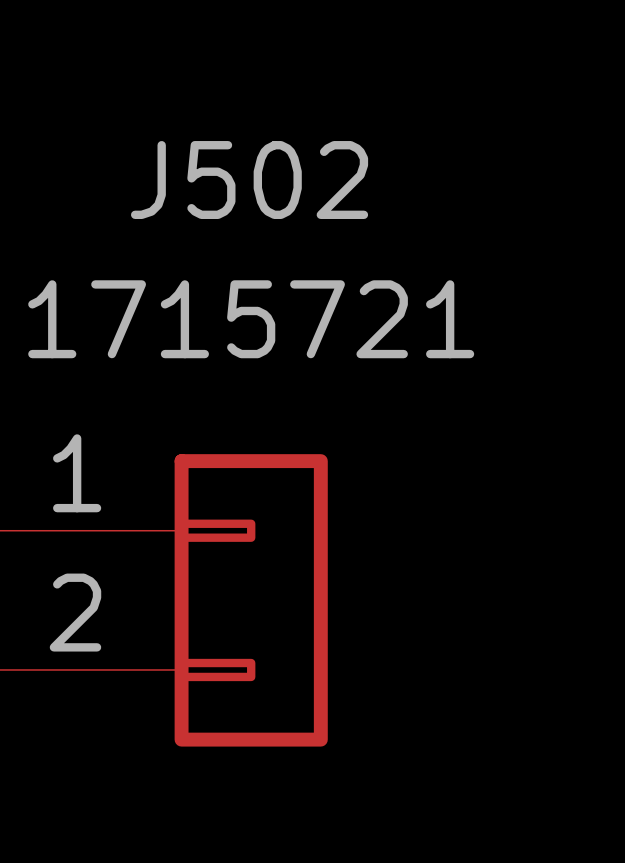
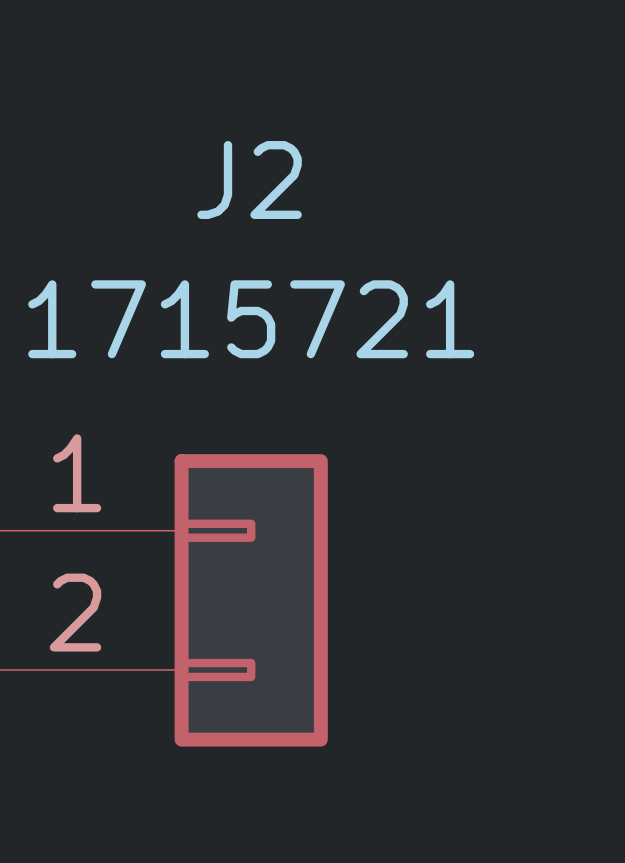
J502 name: J502 (249, 180) -> J2 (249, 180)

